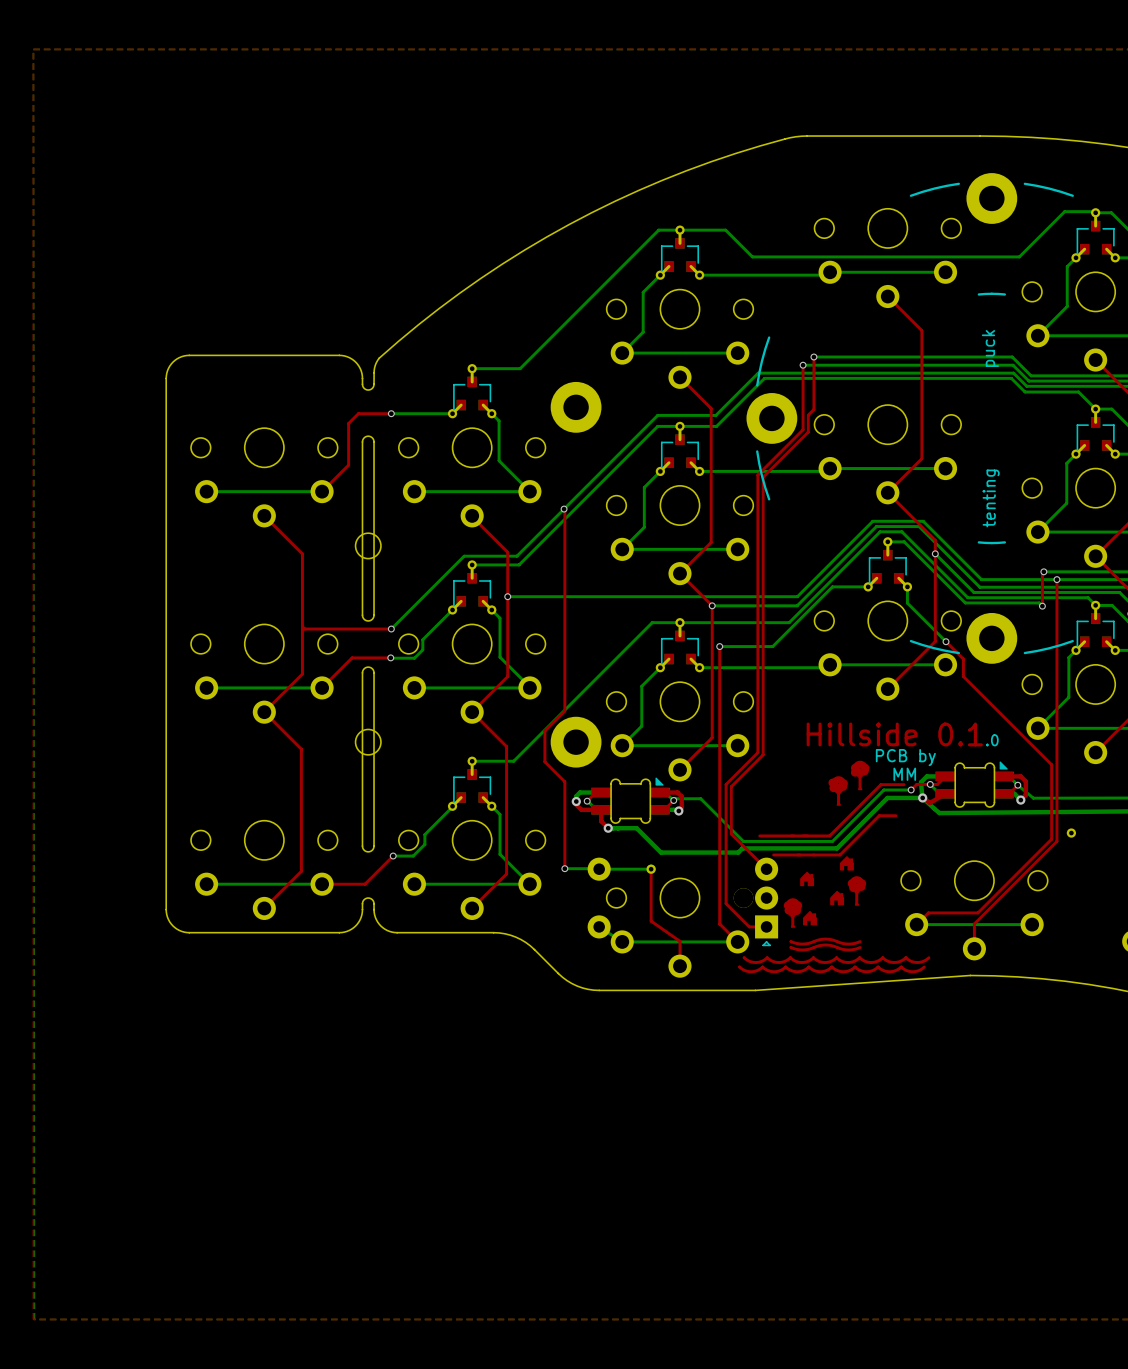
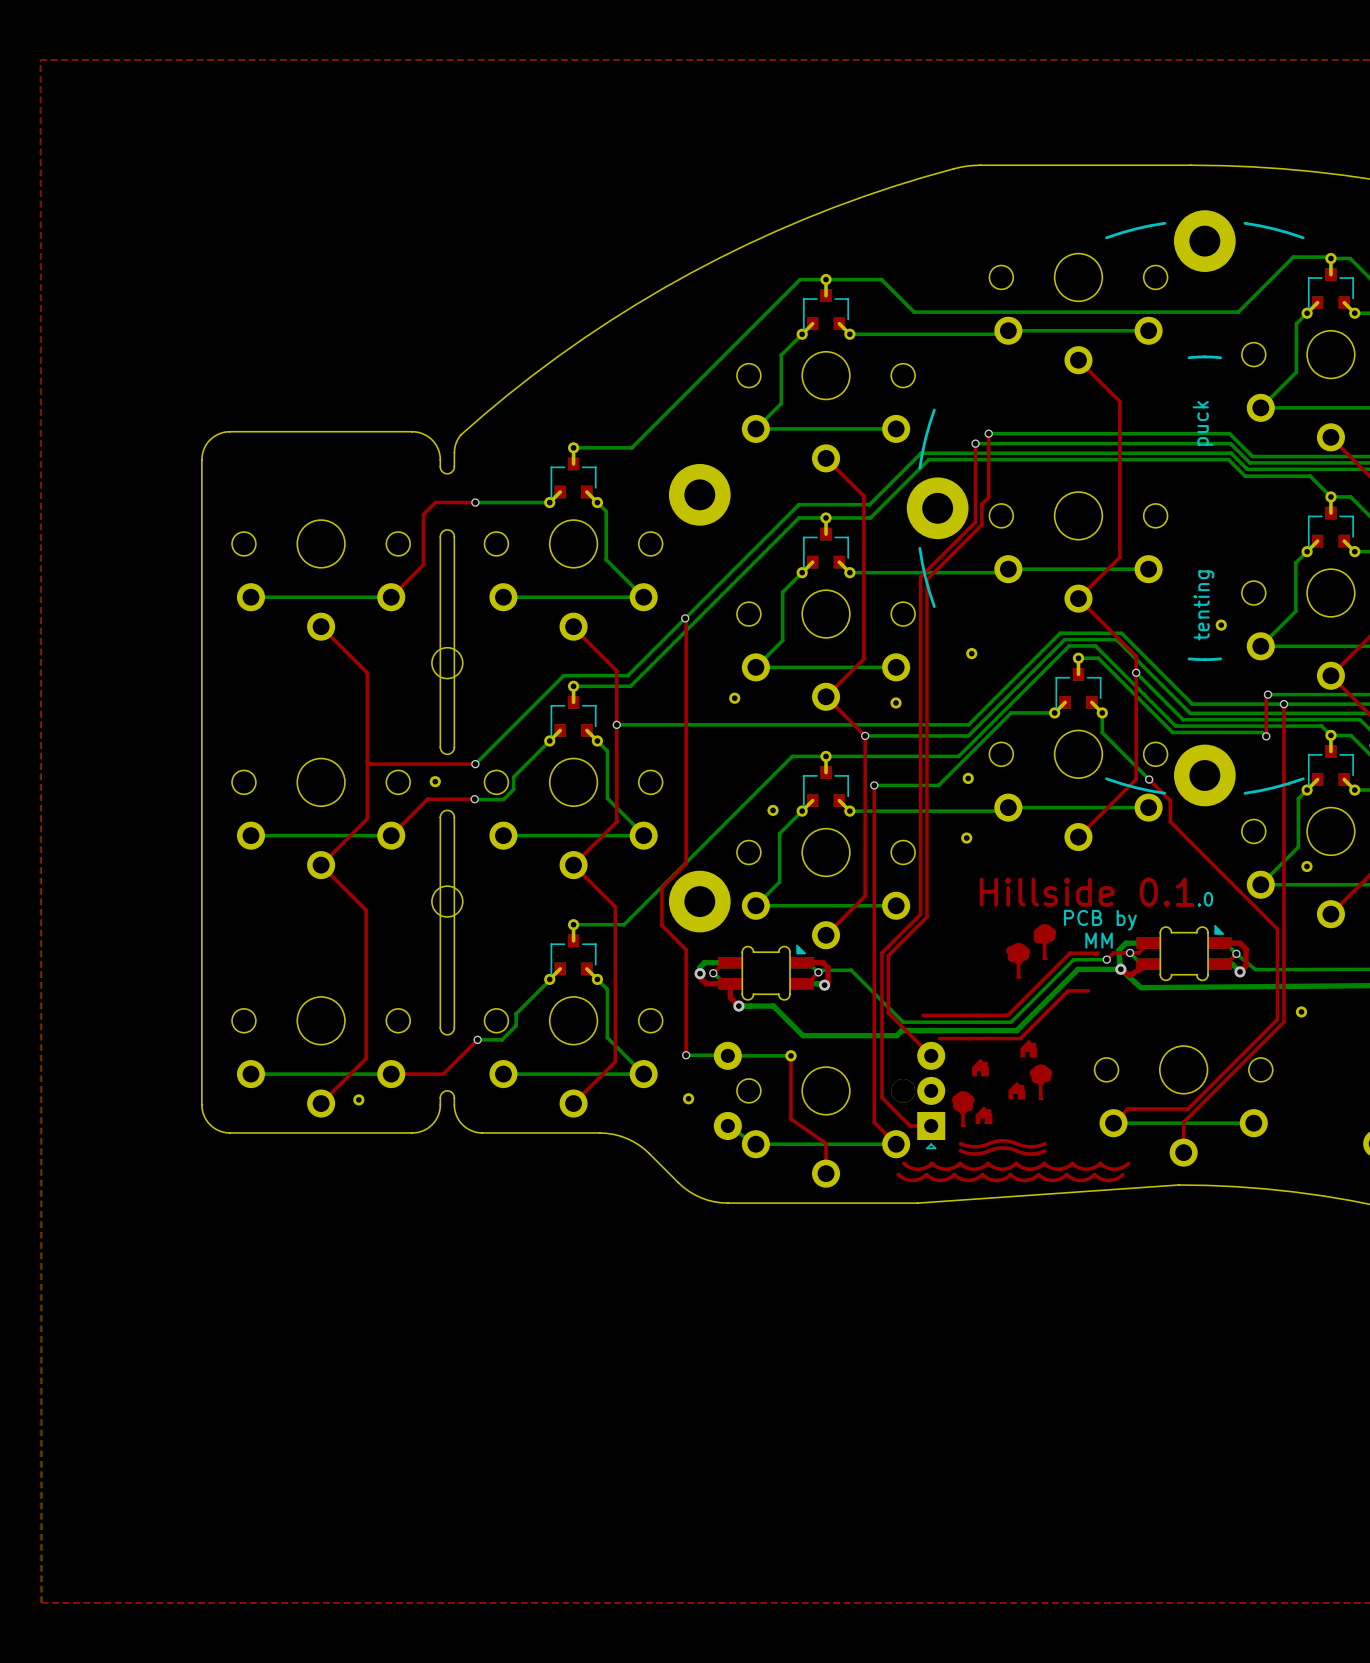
part: none -> (1221, 625)
part: none -> (971, 653)
part: none -> (734, 698)
part: none -> (896, 702)
part: none -> (968, 778)
part: none -> (435, 781)
part: none -> (773, 810)
part: none -> (966, 838)
part: none -> (1306, 866)
part: none -> (688, 1098)
part: none -> (358, 1099)

